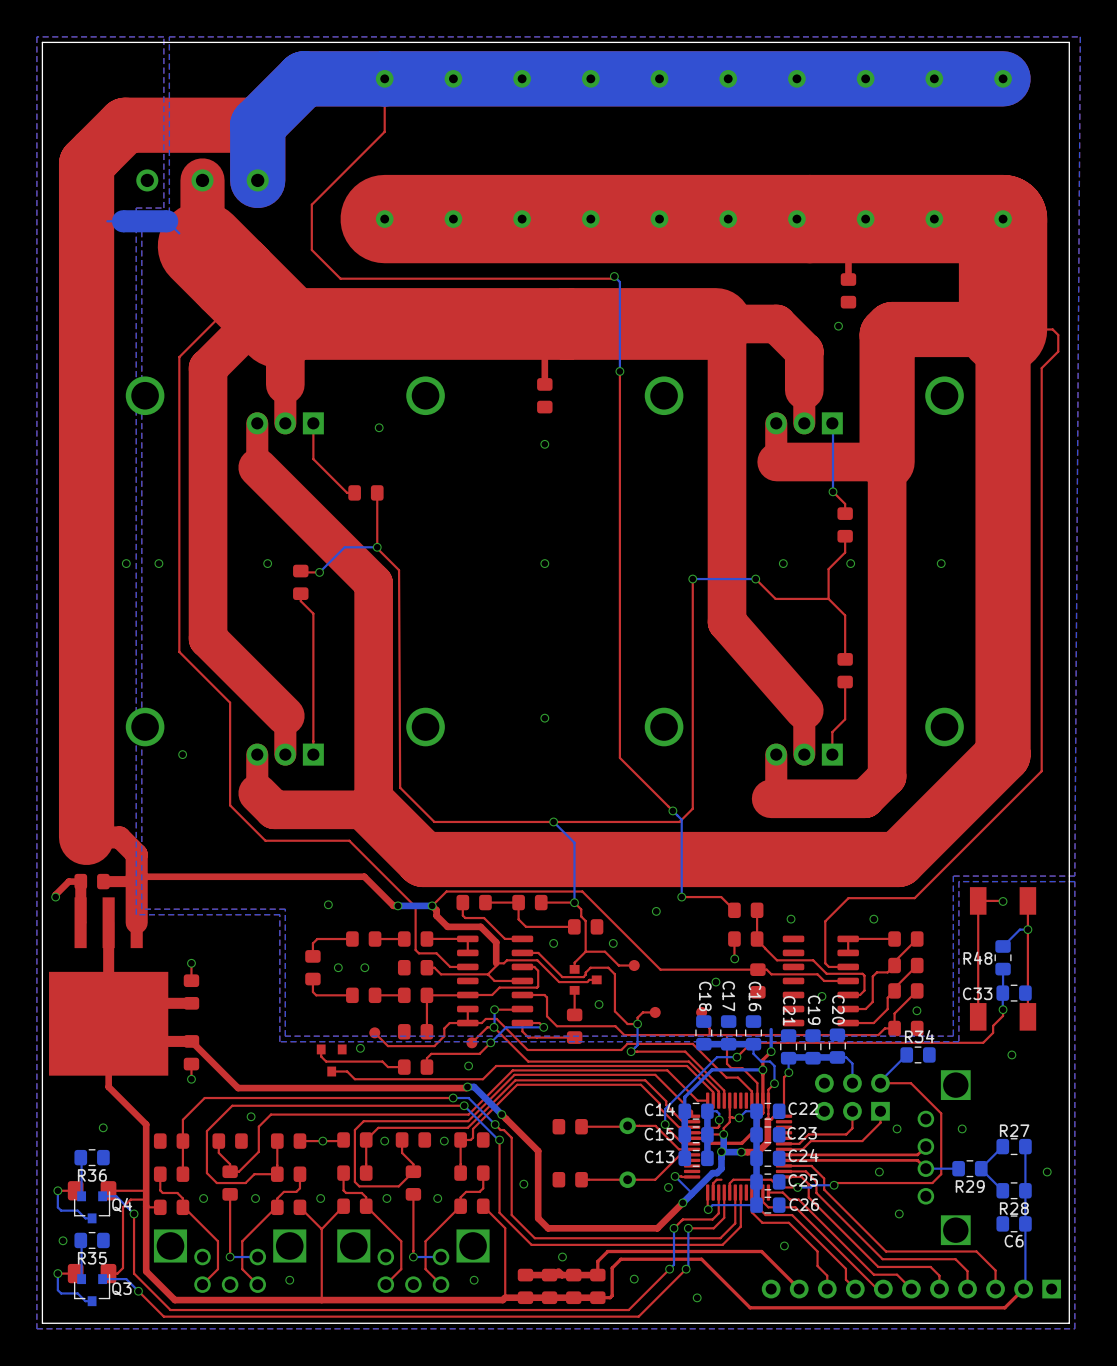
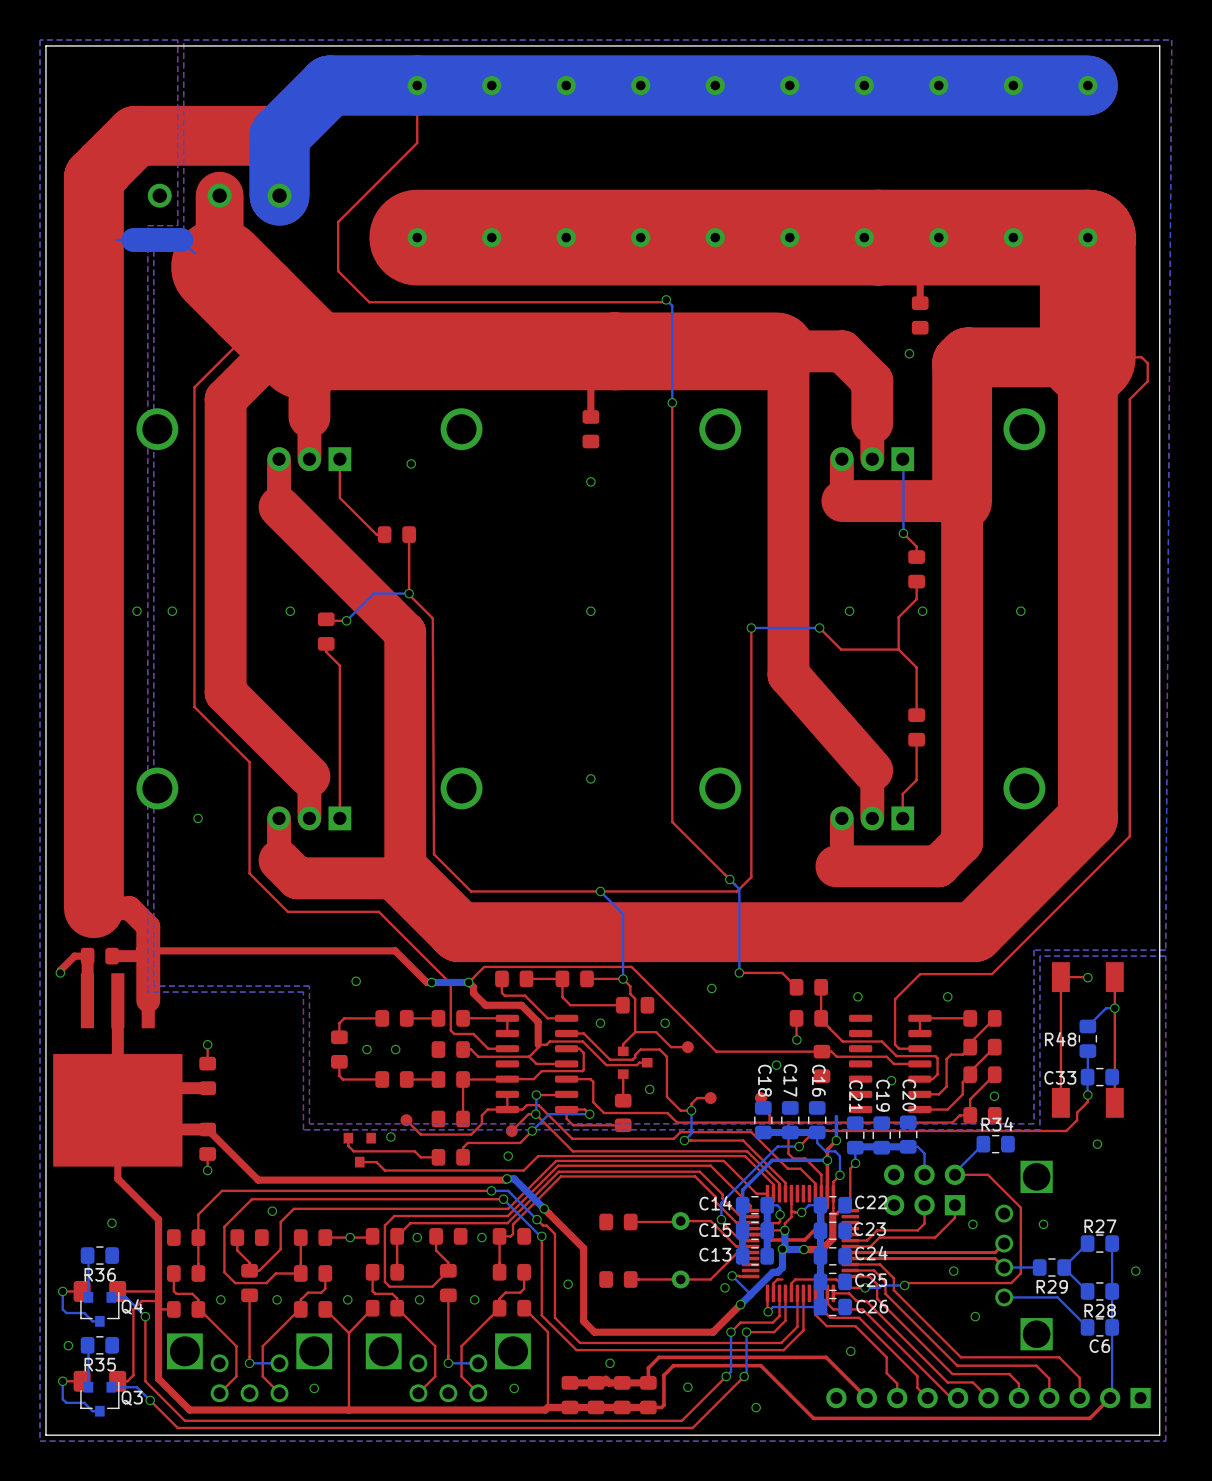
bottom track: none -> (1004, 1297) (1057, 1297) (1087, 1327)

